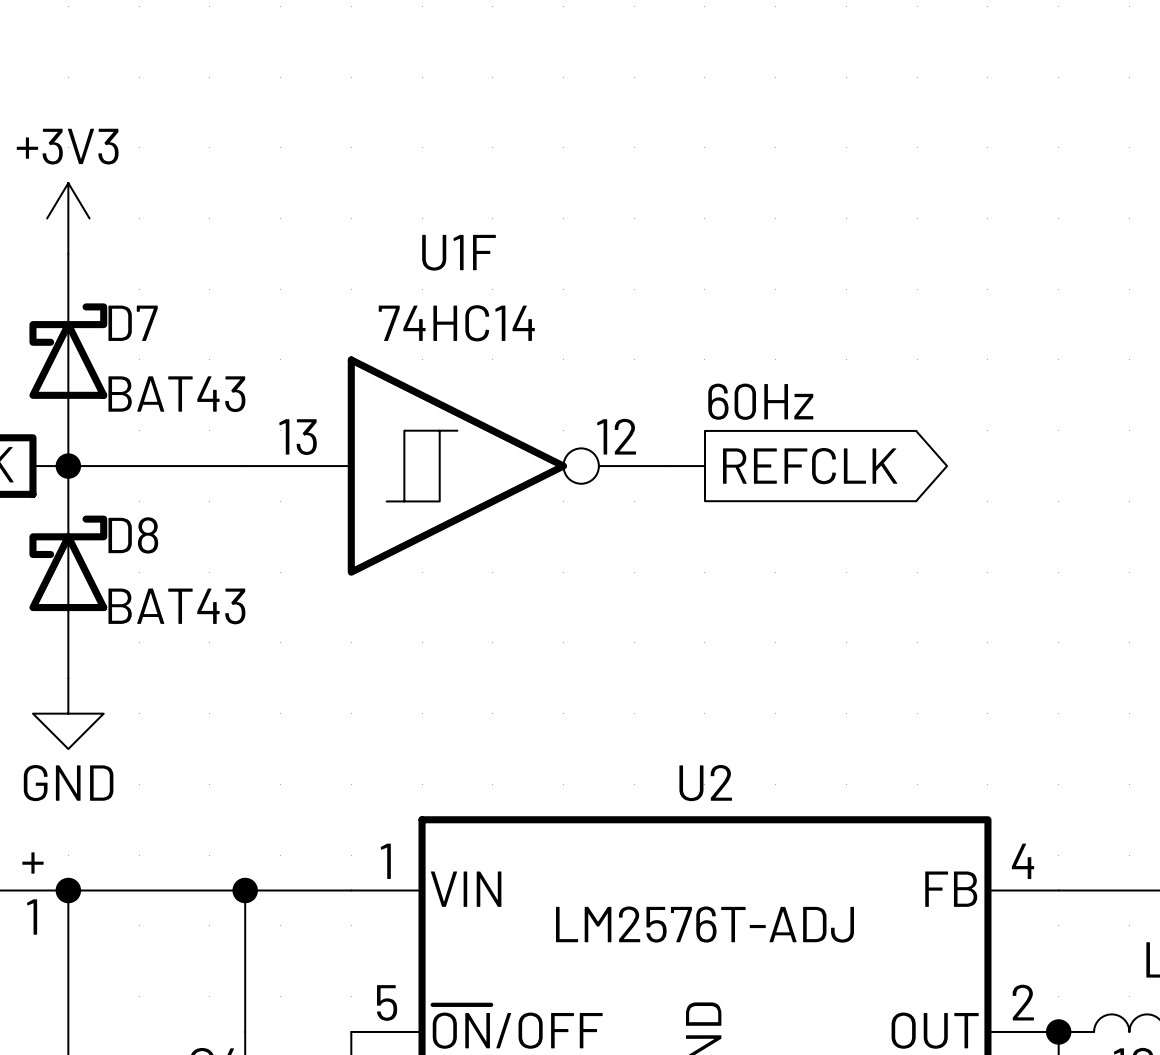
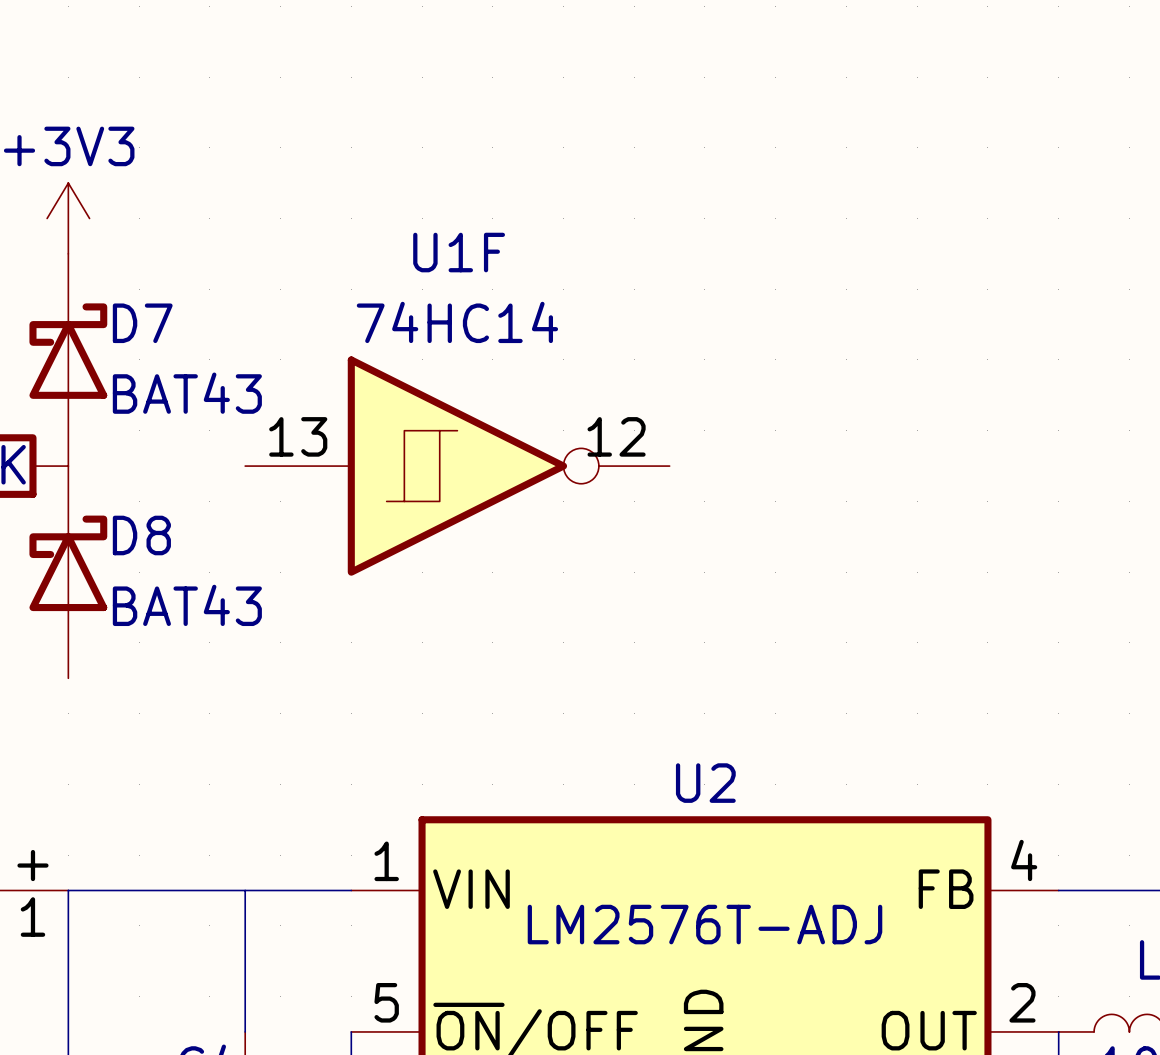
text: 60Hz (760, 401) -> none
wire: (68, 466) (245, 466) -> none
junction: (68, 466) -> none
wire: (669, 466) (704, 466) -> none
global label: REFCLK (810, 466) -> none
power symbol: GND (68, 713) -> none
junction: (68, 890) -> none
junction: (245, 890) -> none
junction: (1058, 1031) -> none

